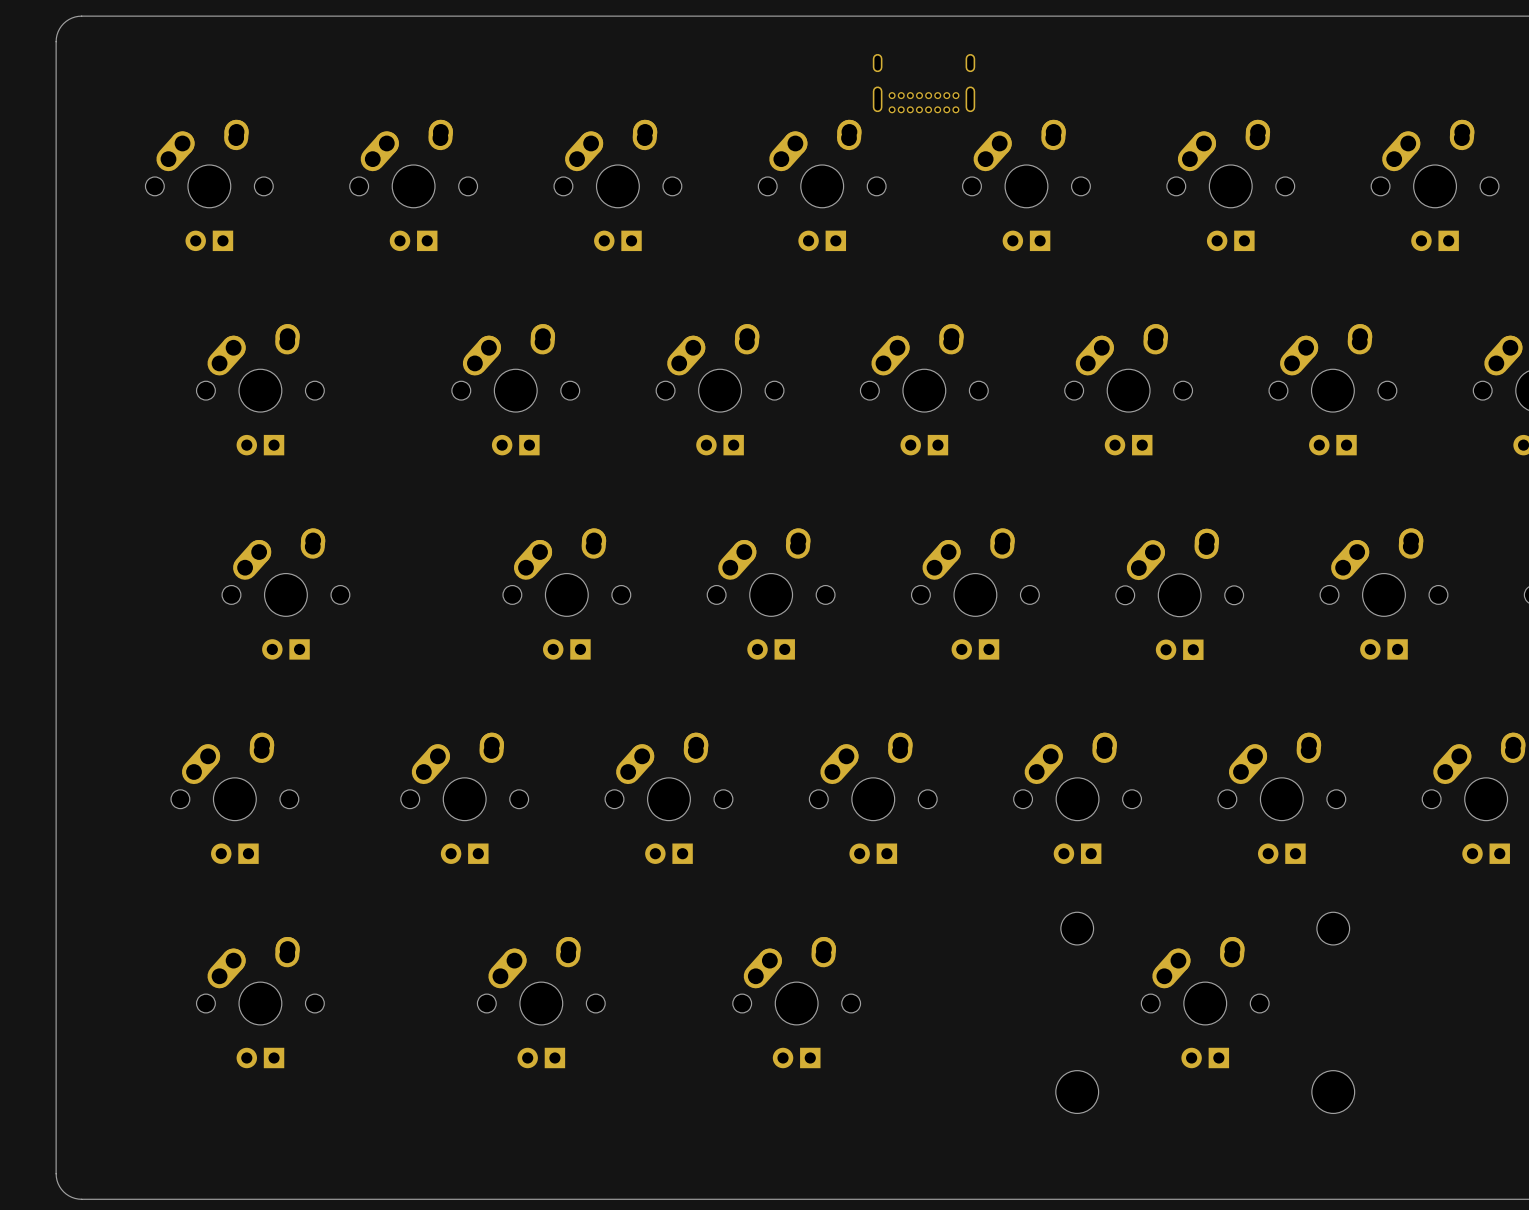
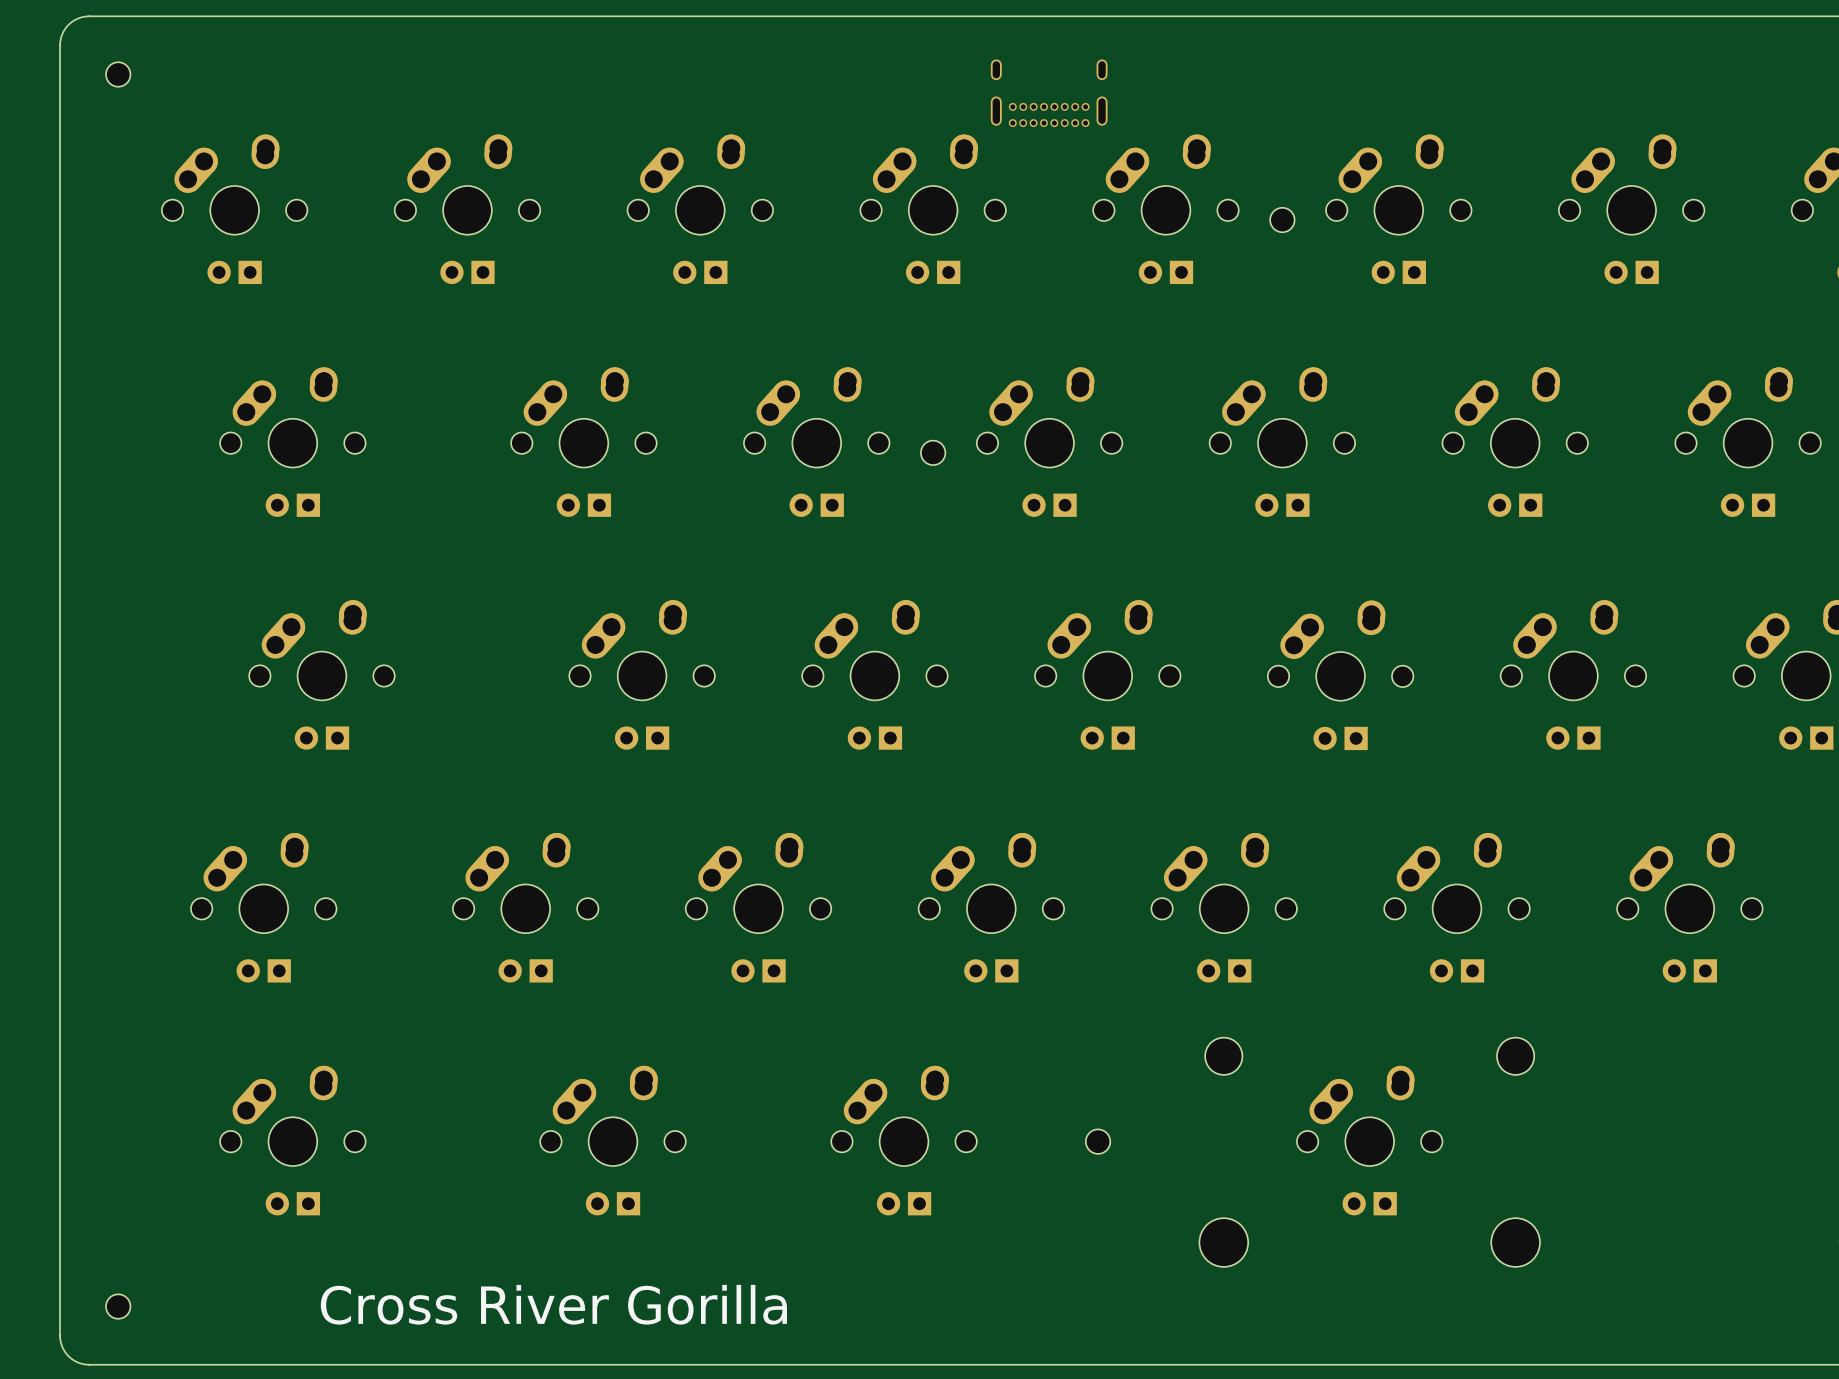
part: none -> (118, 74)
part: none -> (1282, 220)
part: none -> (933, 452)
part: none -> (1098, 1141)
text: none -> Cross River Gorilla (553, 1304)
part: none -> (118, 1306)

